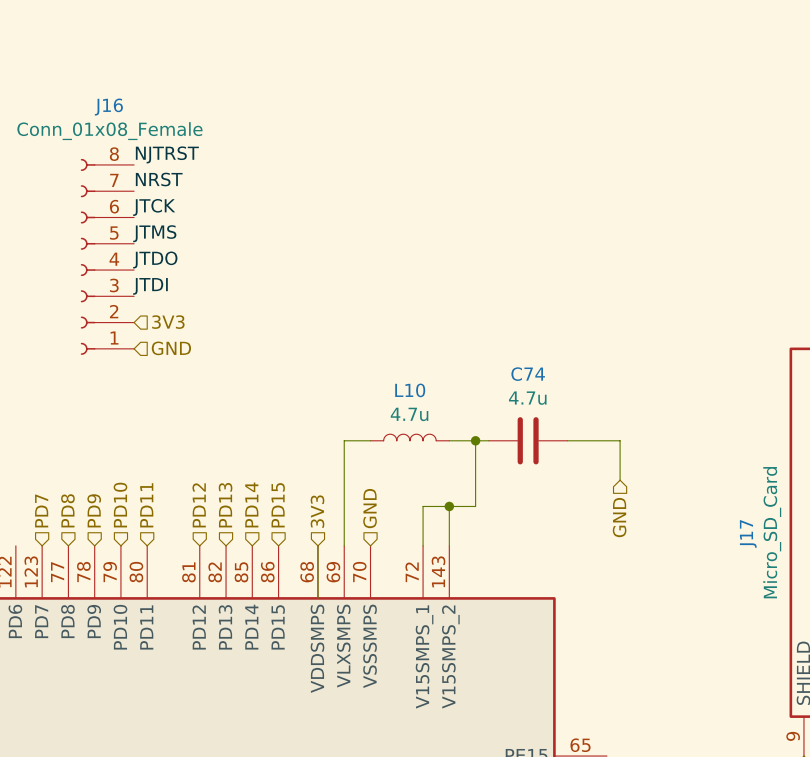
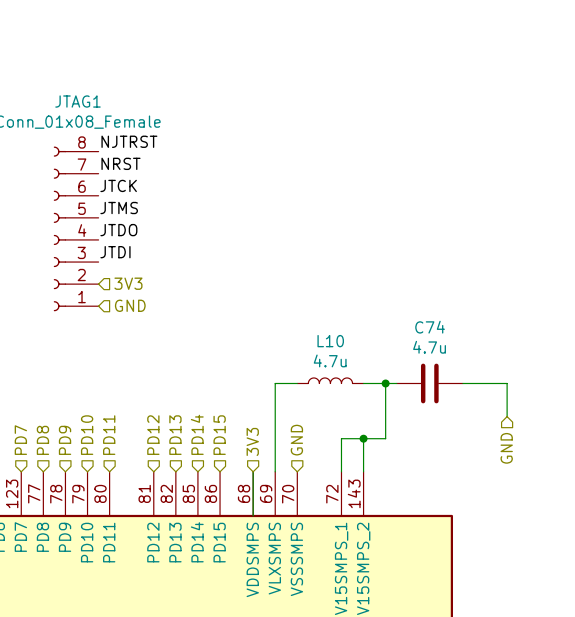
J16 name: J16 (108, 107) -> JTAG1 (77, 101)

